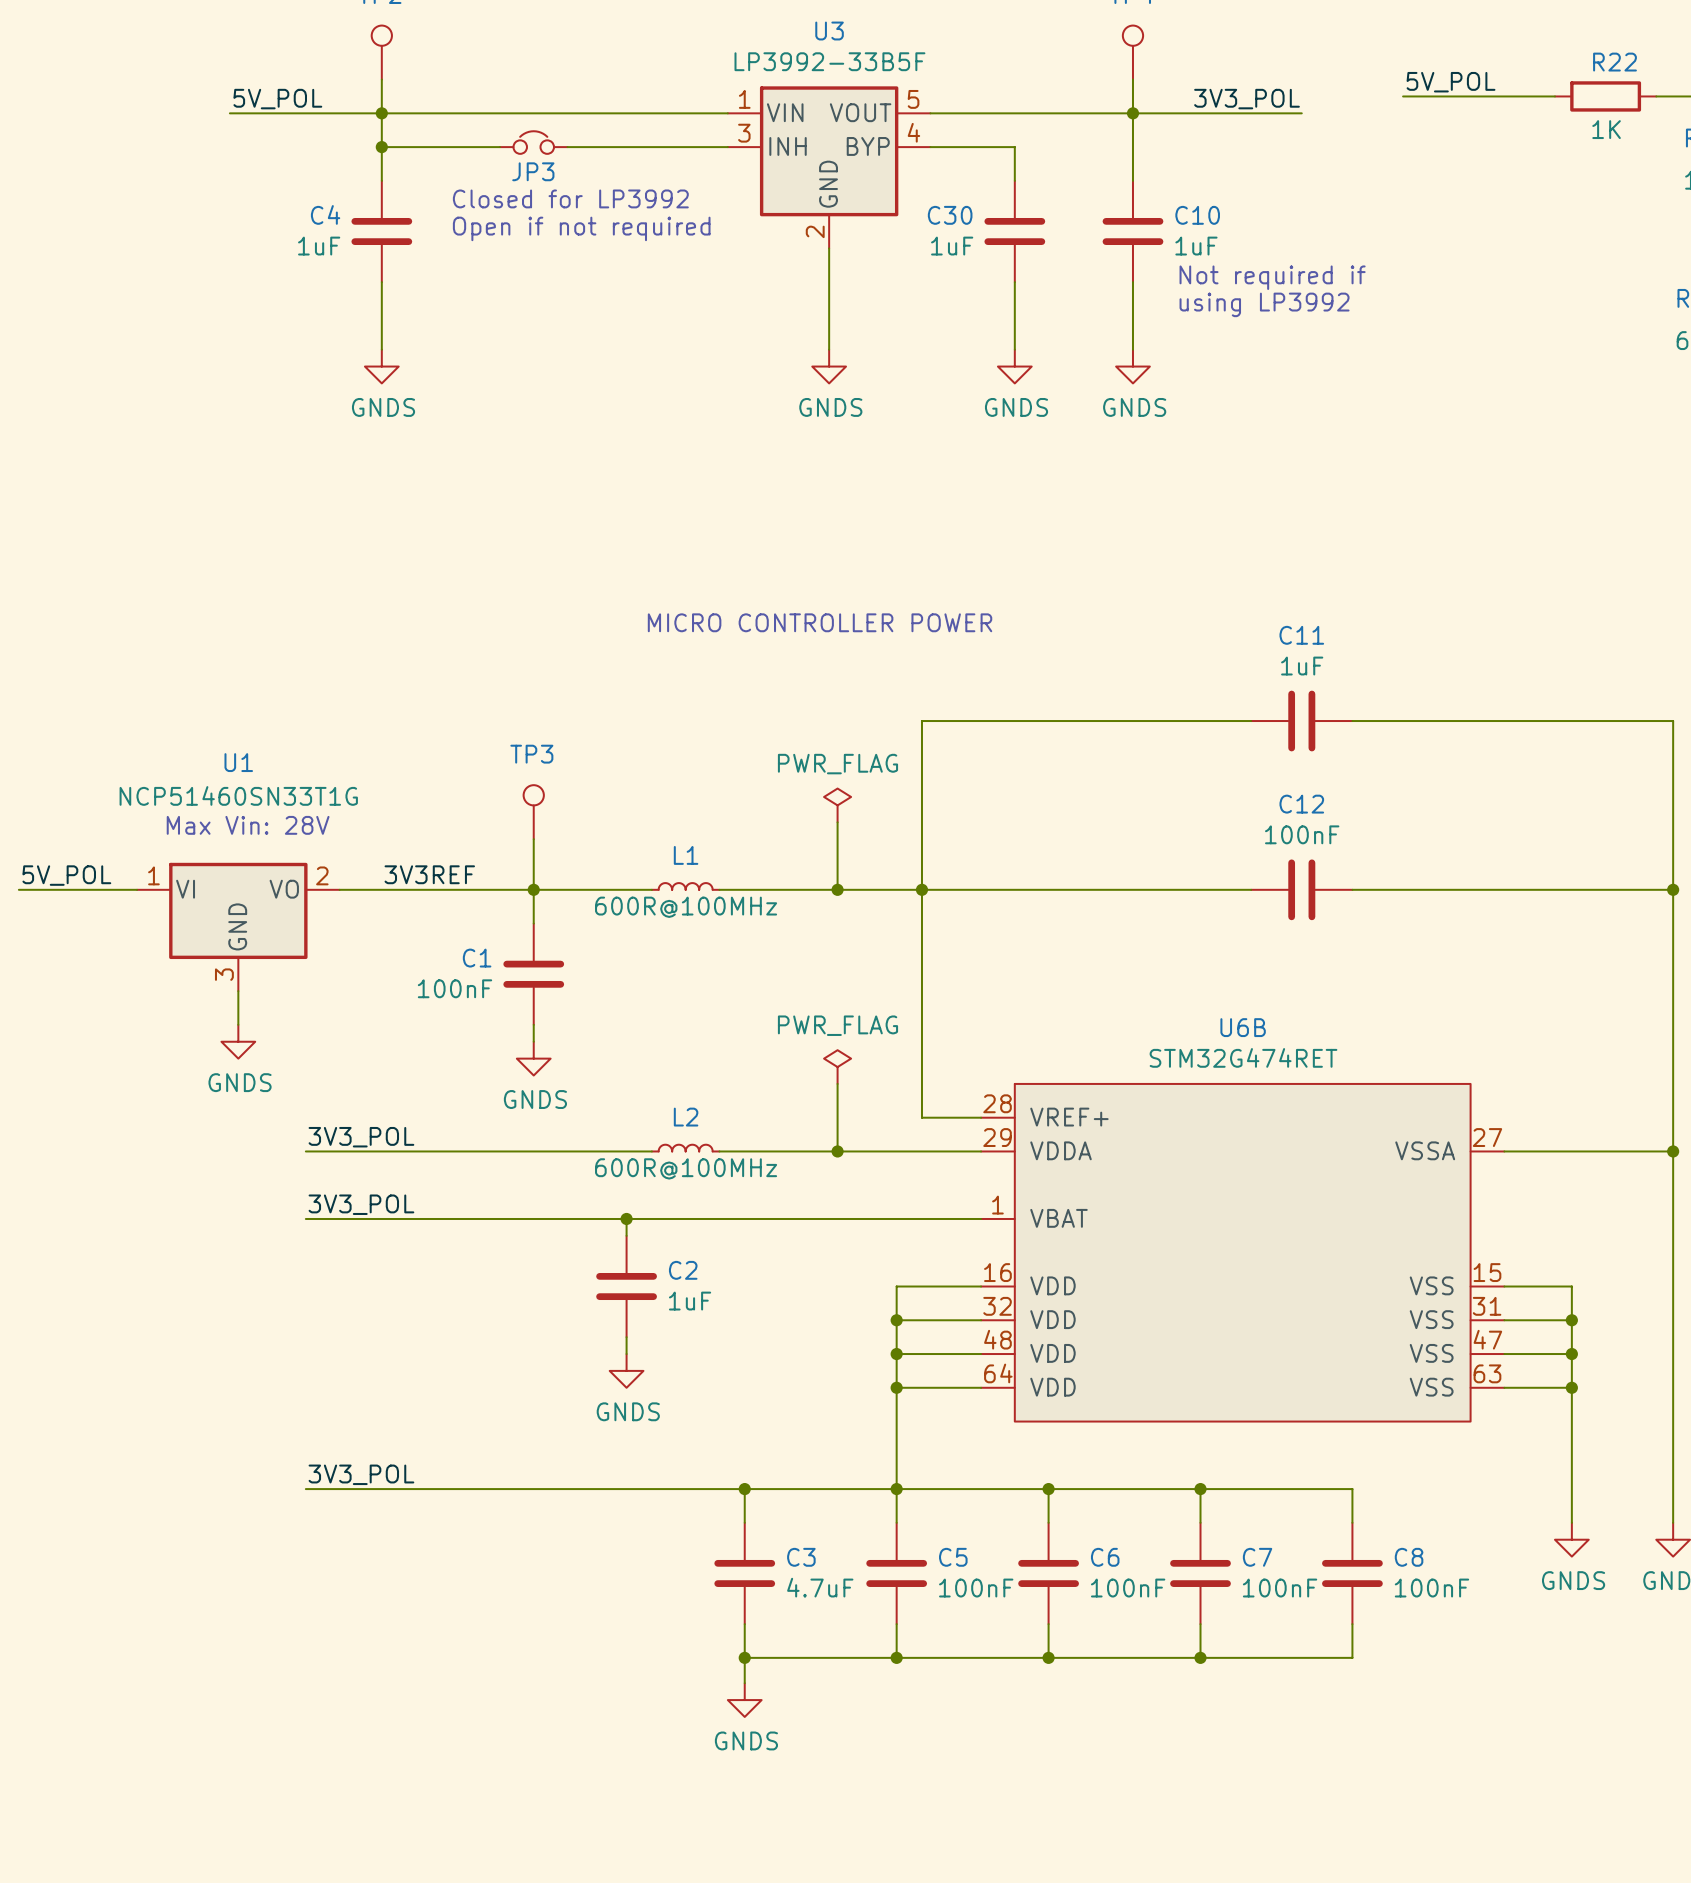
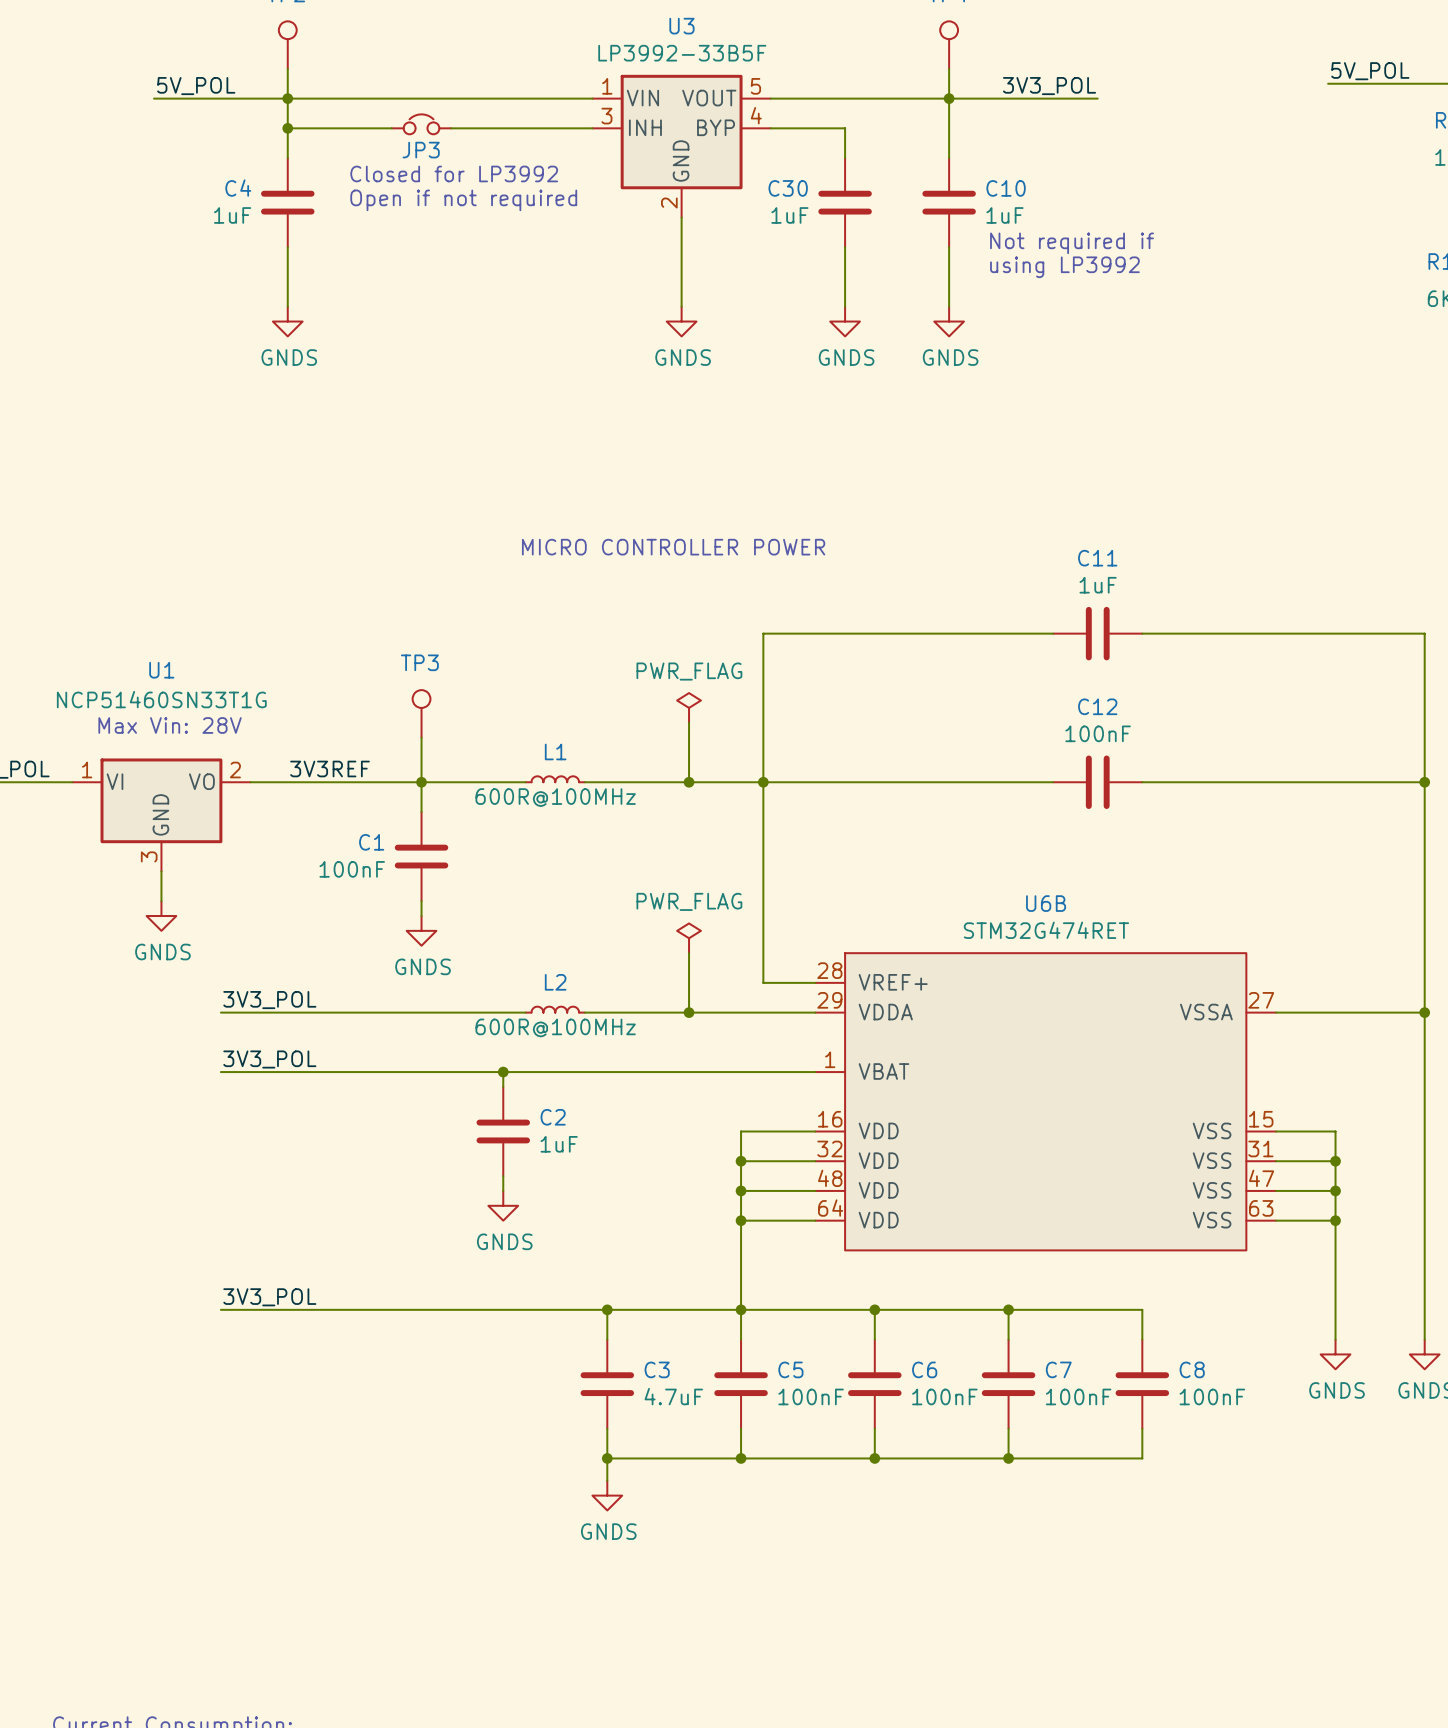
label position: 5V_POL (1451, 82) -> 5V_POL (1370, 71)
wire: (1403, 96) (1554, 96) -> none
wire: none -> (1328, 83) (1409, 83)
R22: 1K (1605, 96) -> none

